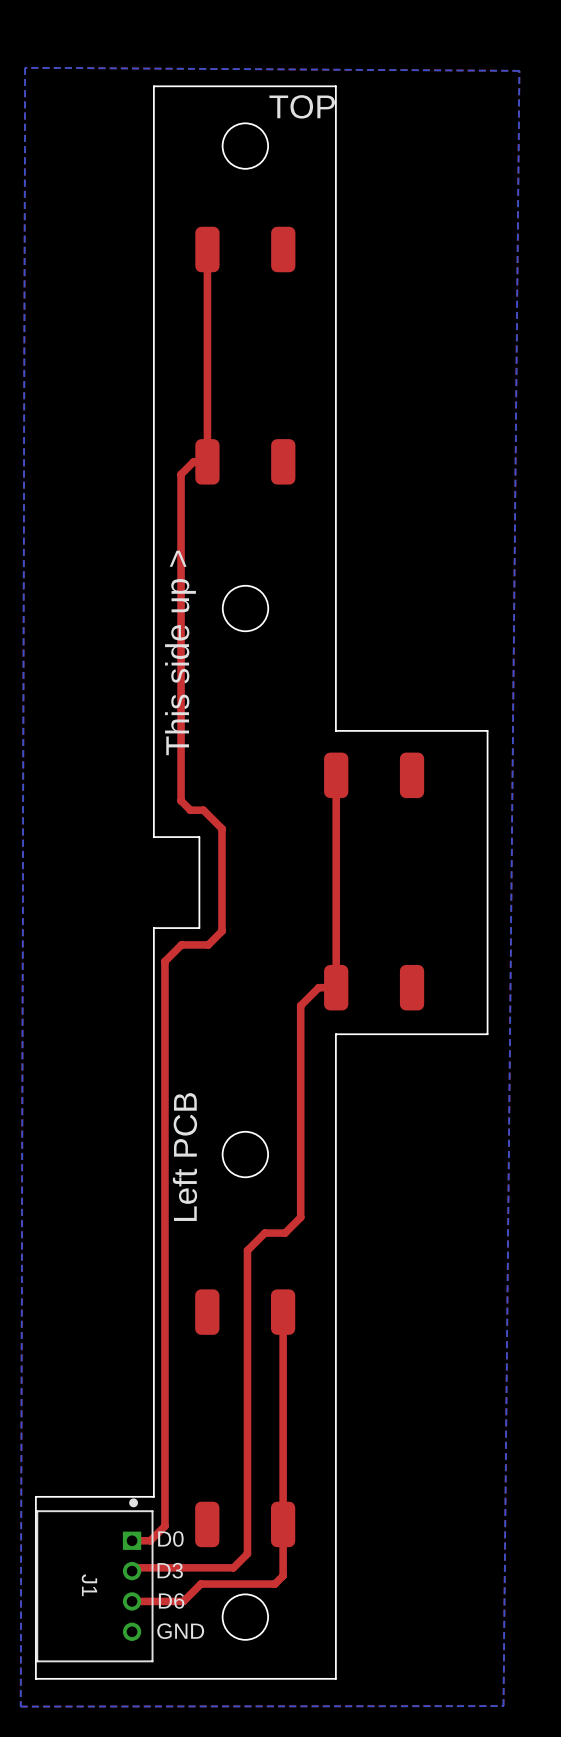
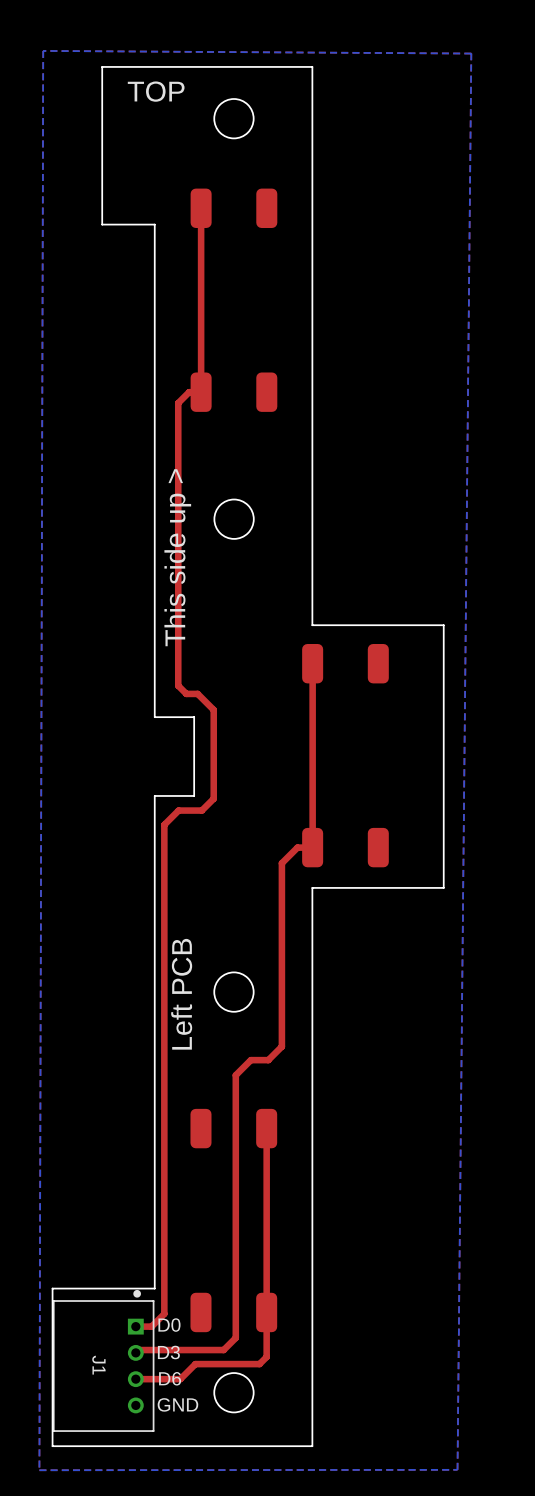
board edge: (153, 86) (153, 268) -> (154, 66) (102, 66) (102, 224) (154, 224)
text position: TOP (302, 106) -> TOP (156, 91)

